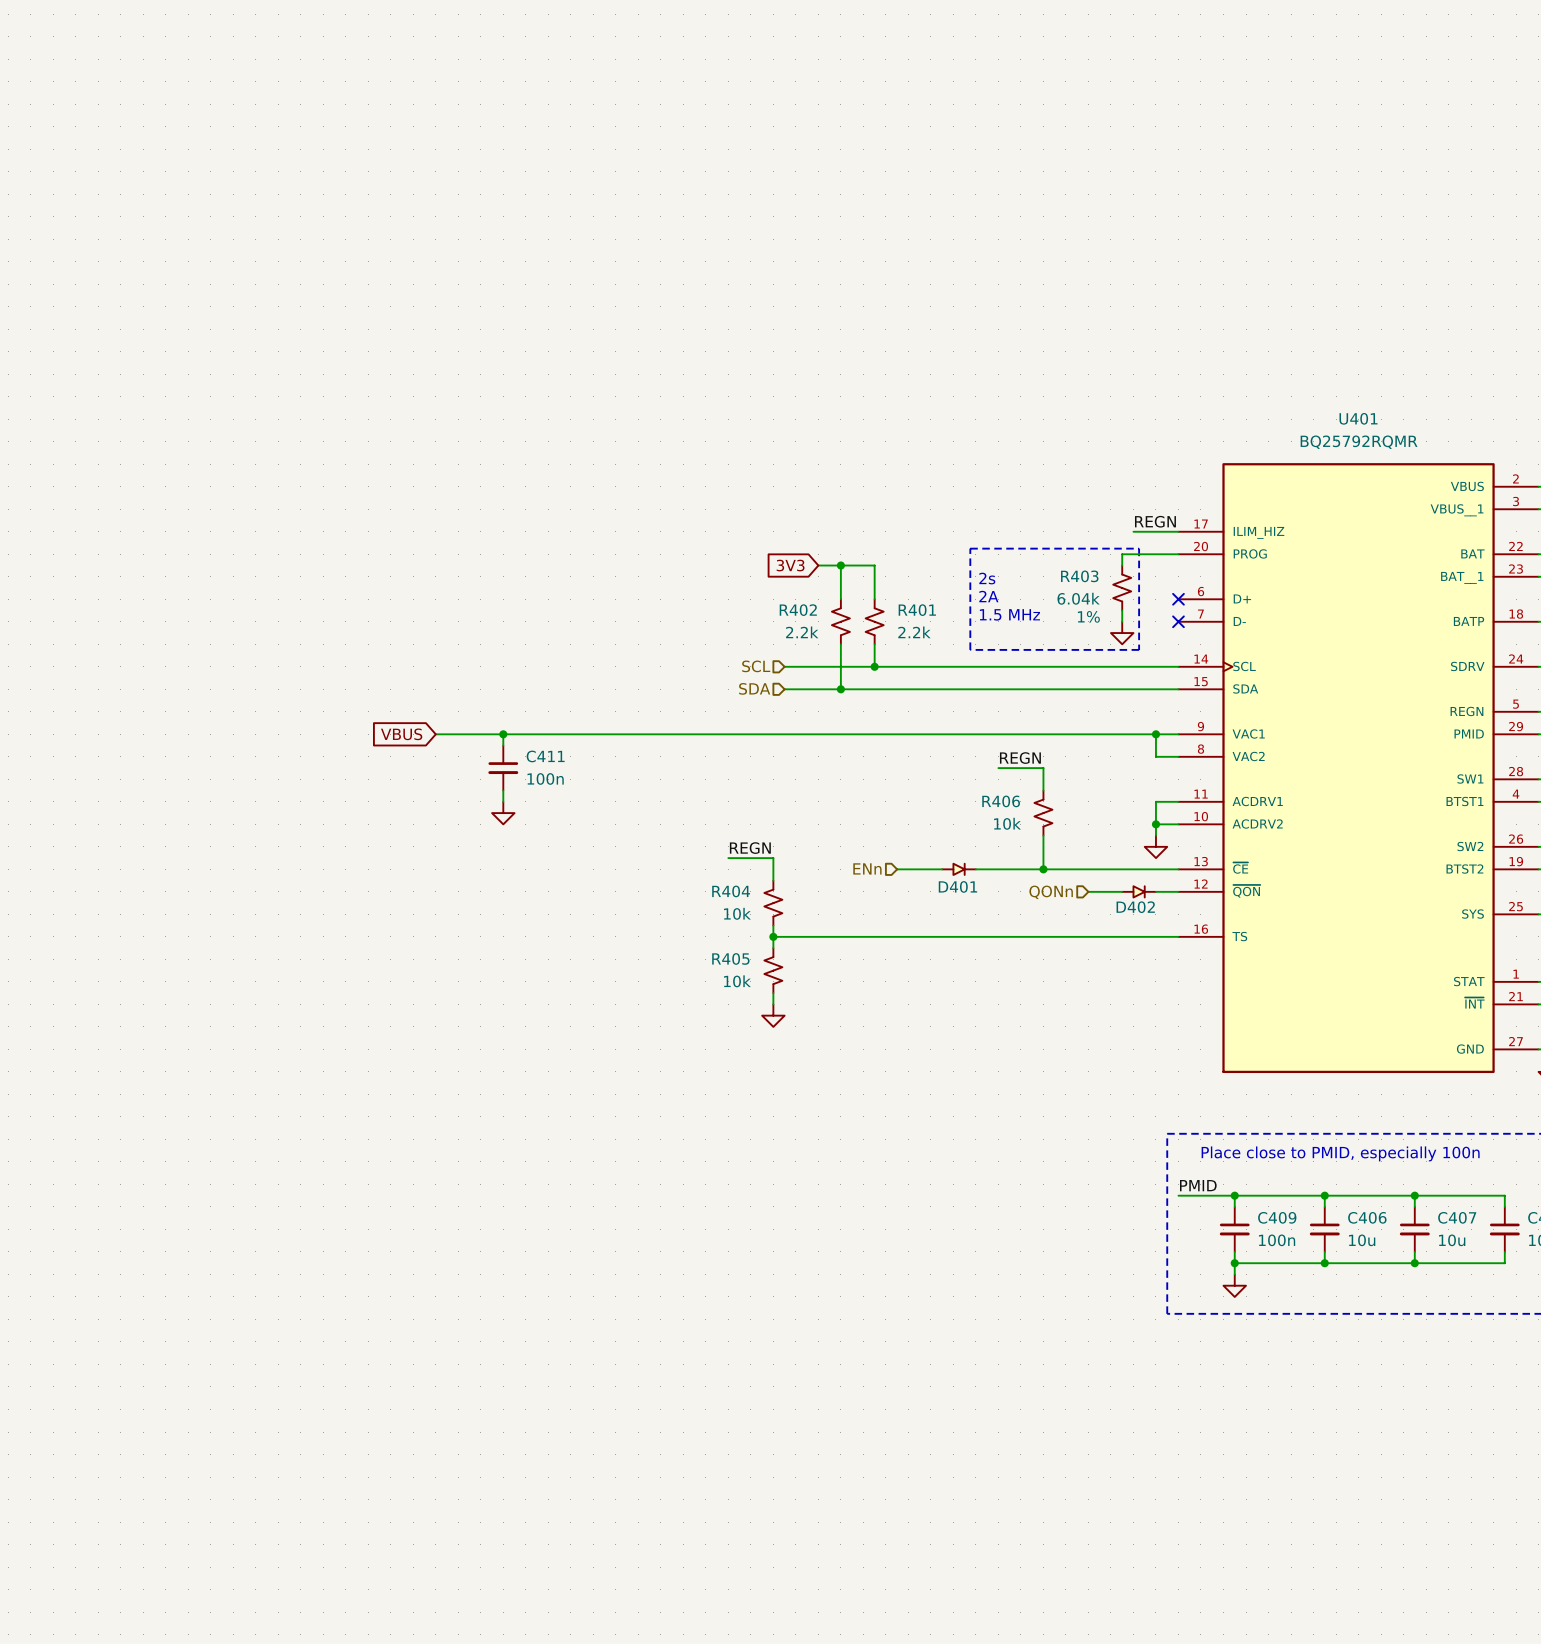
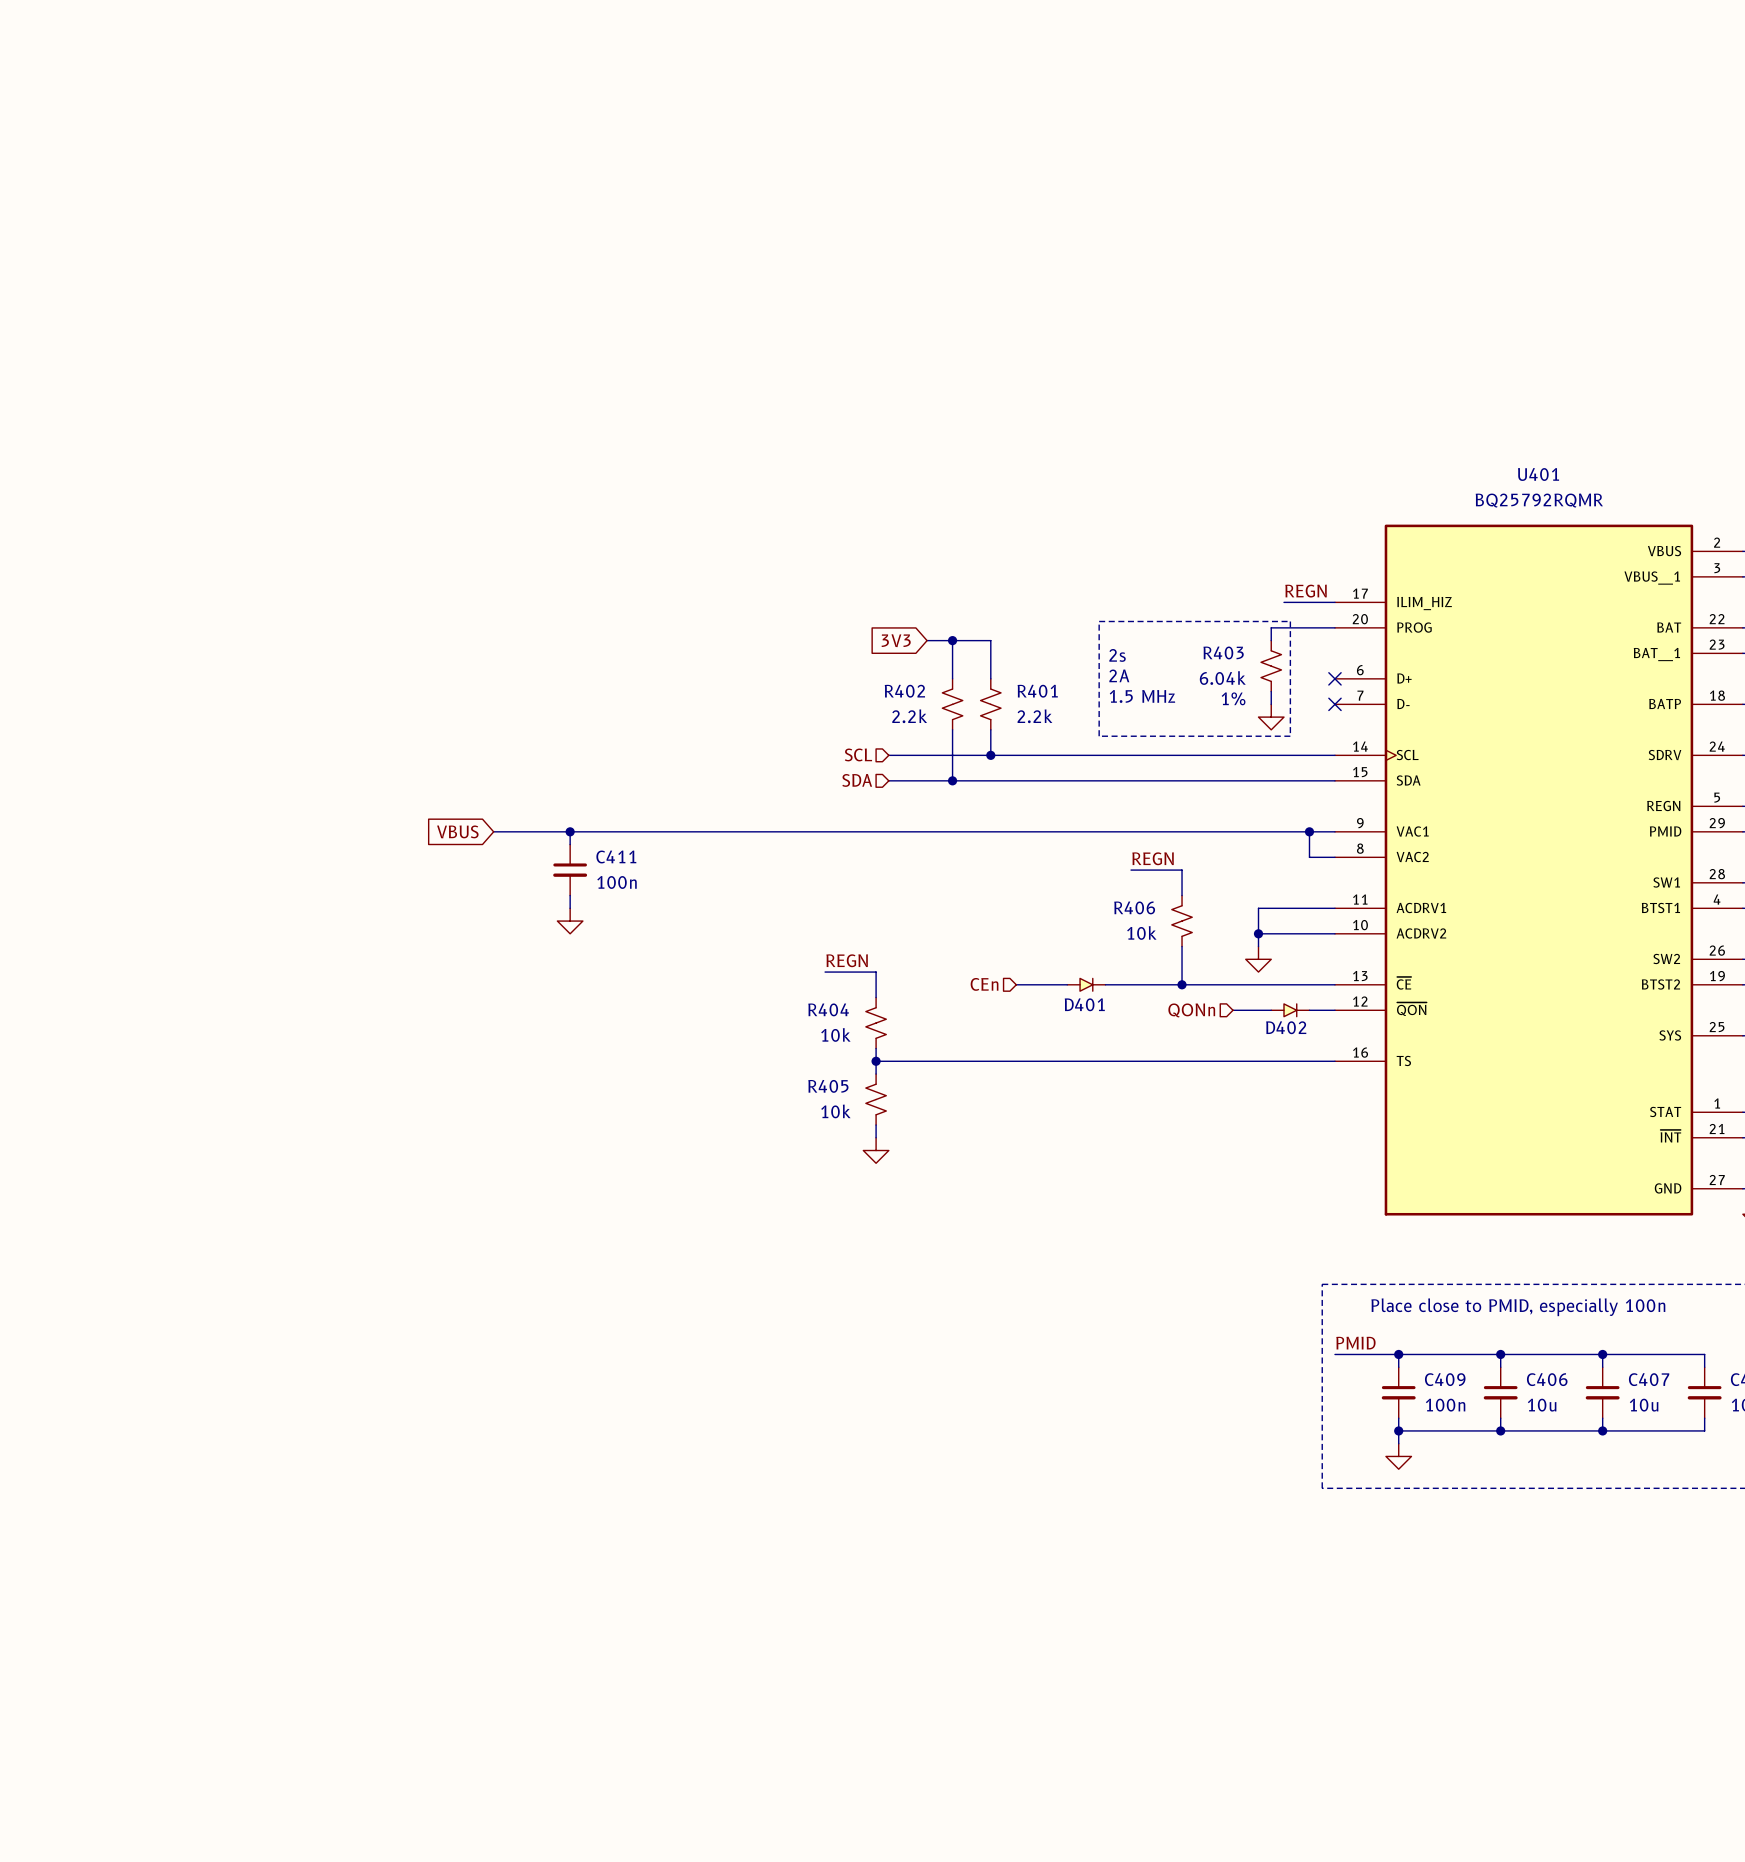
wire: (1155, 801) (1155, 835) -> (1309, 908) (1258, 908) (1258, 946)
wire: none -> (1258, 933) (1309, 933)
junction position: (1155, 824) -> (1258, 933)
power symbol position: (1155, 846) -> (1258, 959)
hierarchical label: ENn (867, 868) -> CEn (984, 984)

